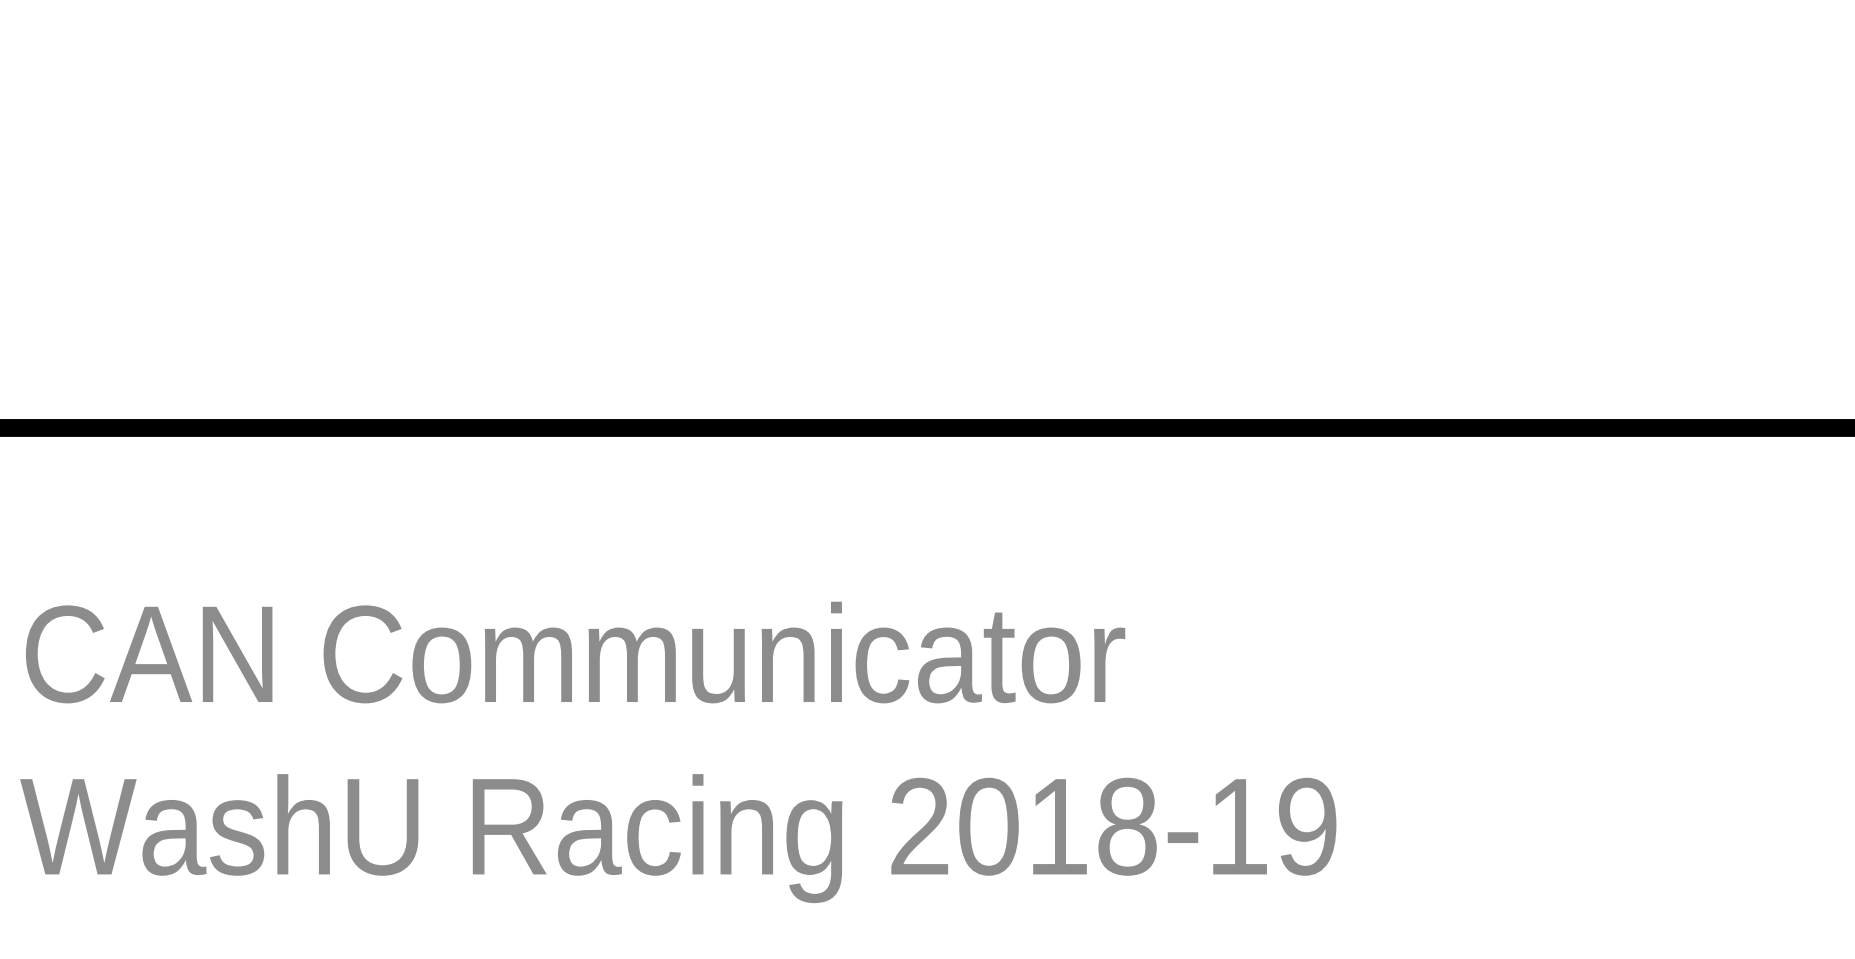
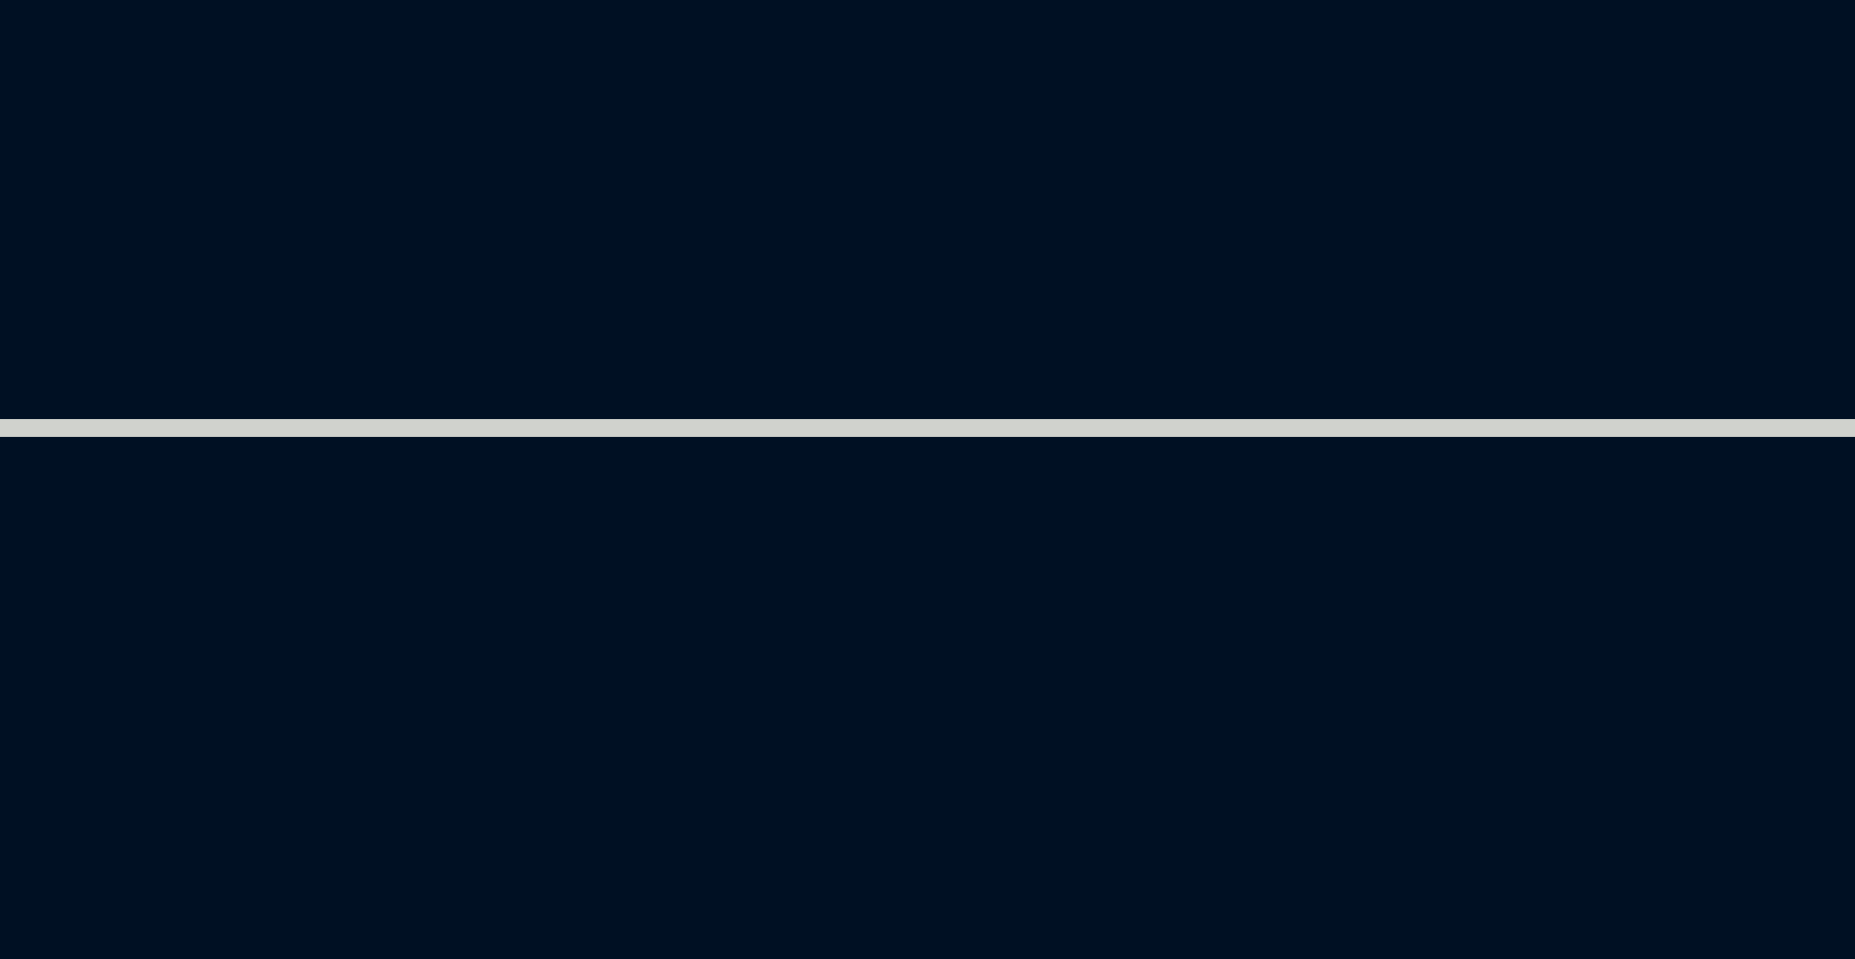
text: CAN Communicator (575, 652) -> none
text: WashU Racing 2018-19 (678, 838) -> none

